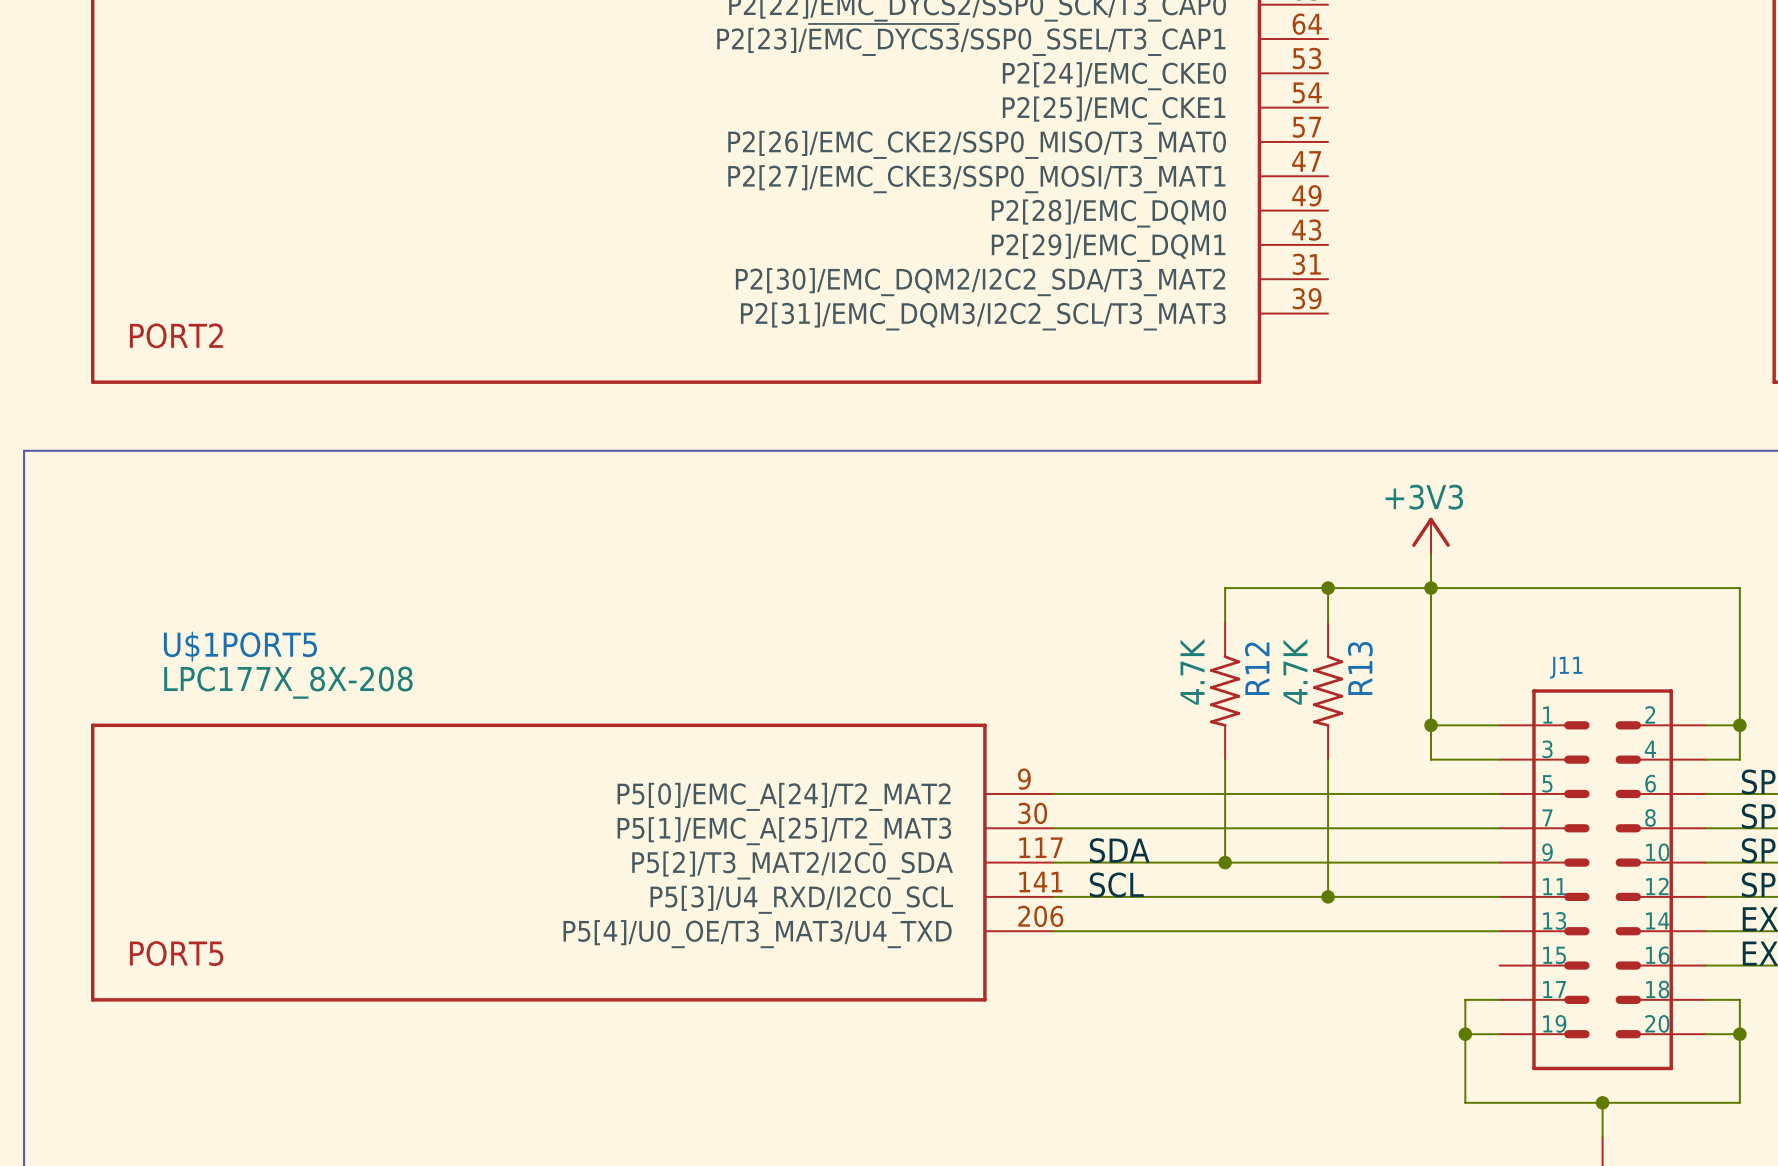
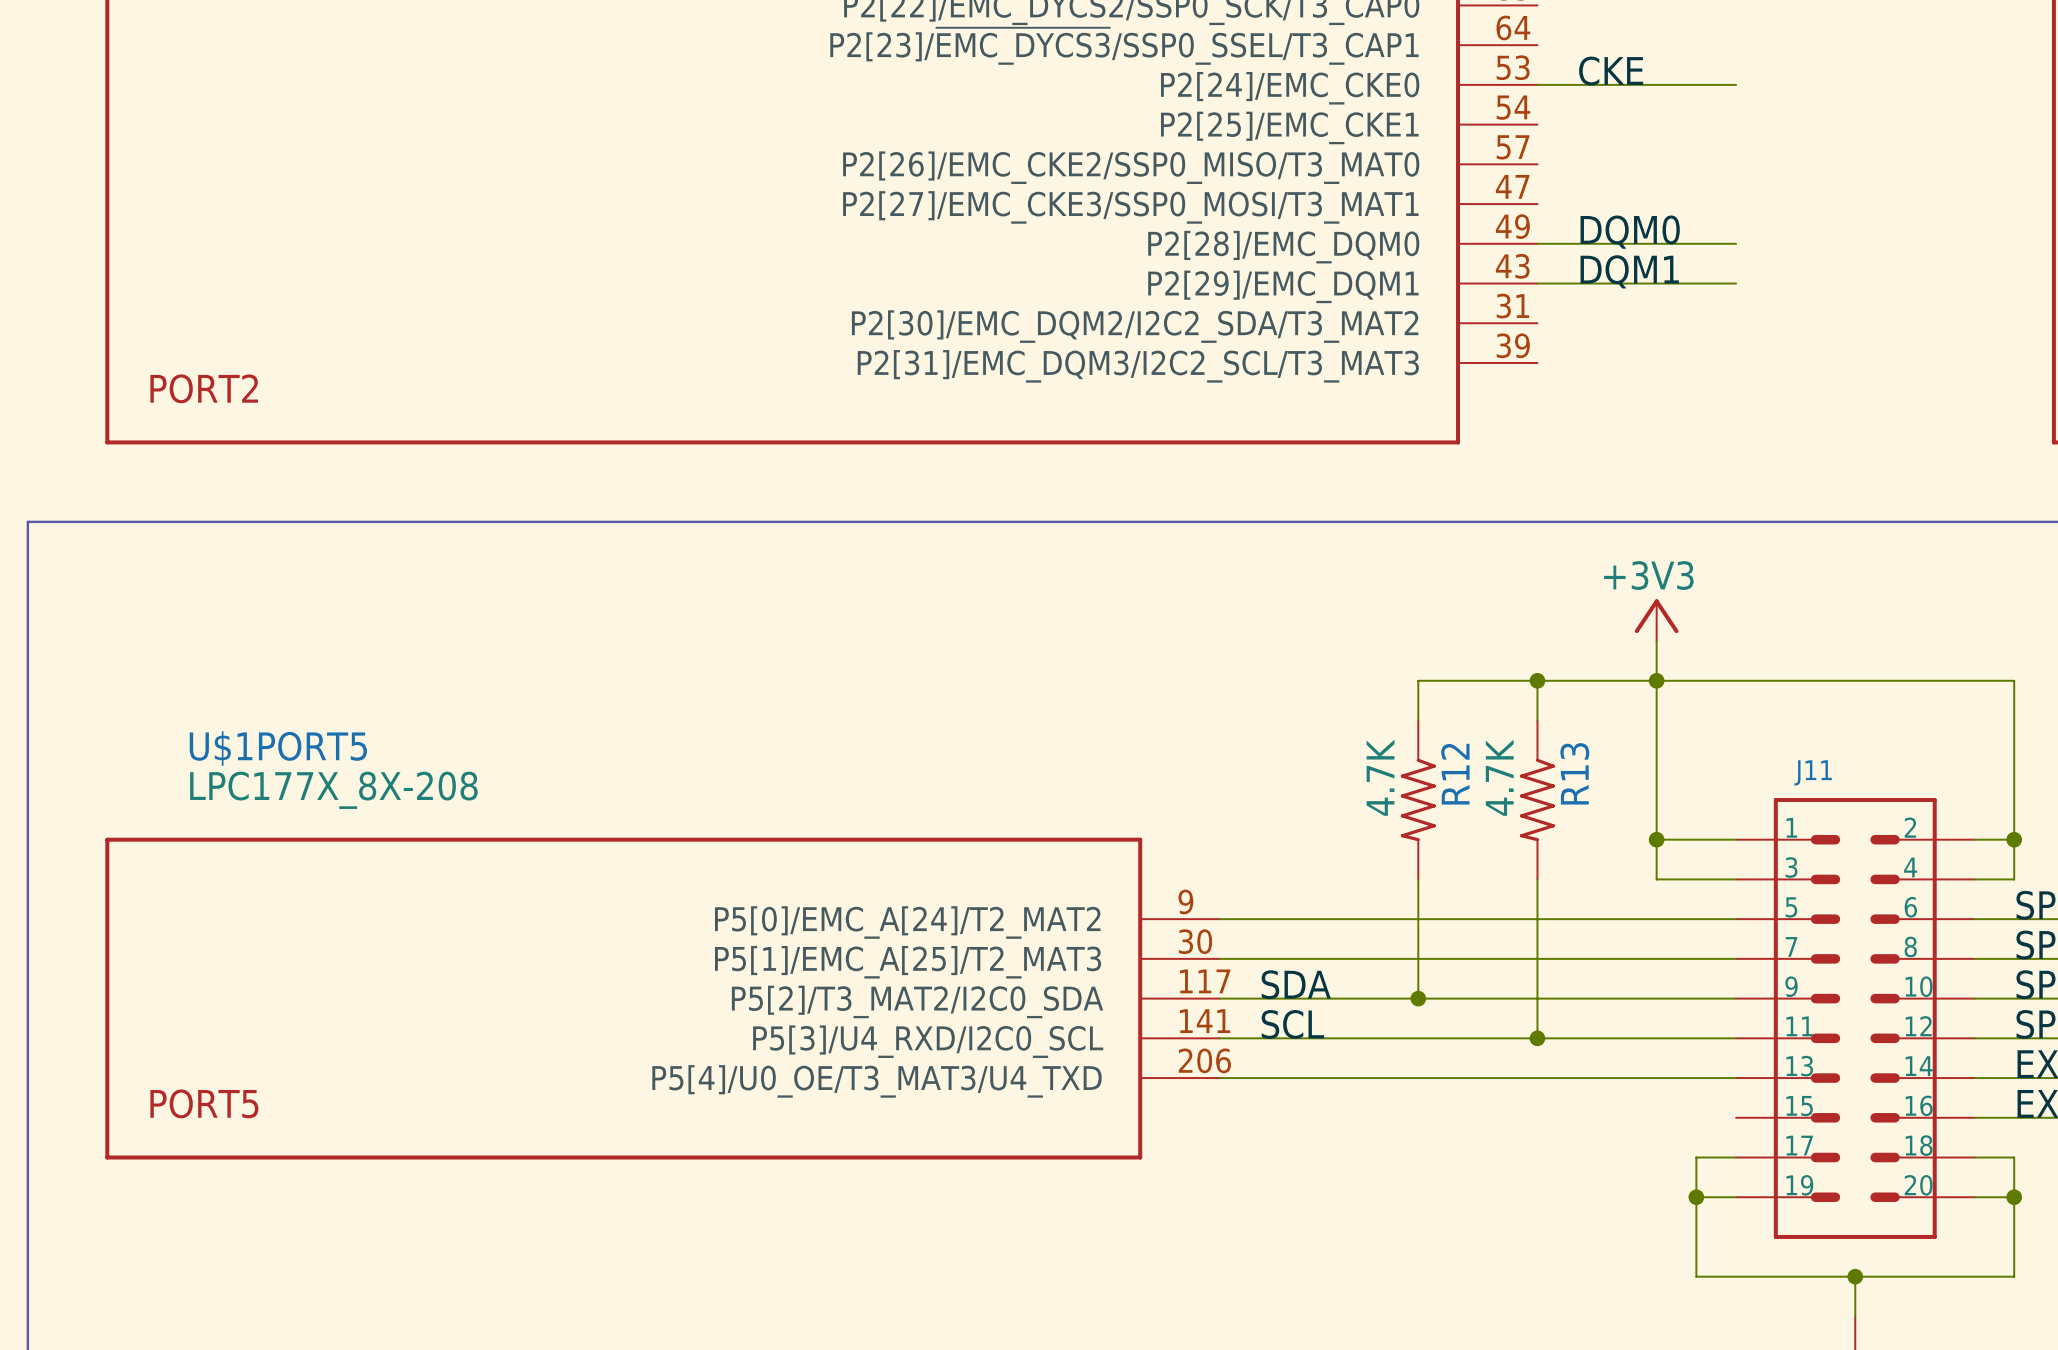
label: none -> CKE (1611, 71)
wire: none -> (1537, 84) (1736, 84)
label: none -> DQM0 (1630, 232)
wire: none -> (1537, 243) (1736, 243)
label: none -> DQM1 (1629, 271)
wire: none -> (1537, 283) (1736, 283)

